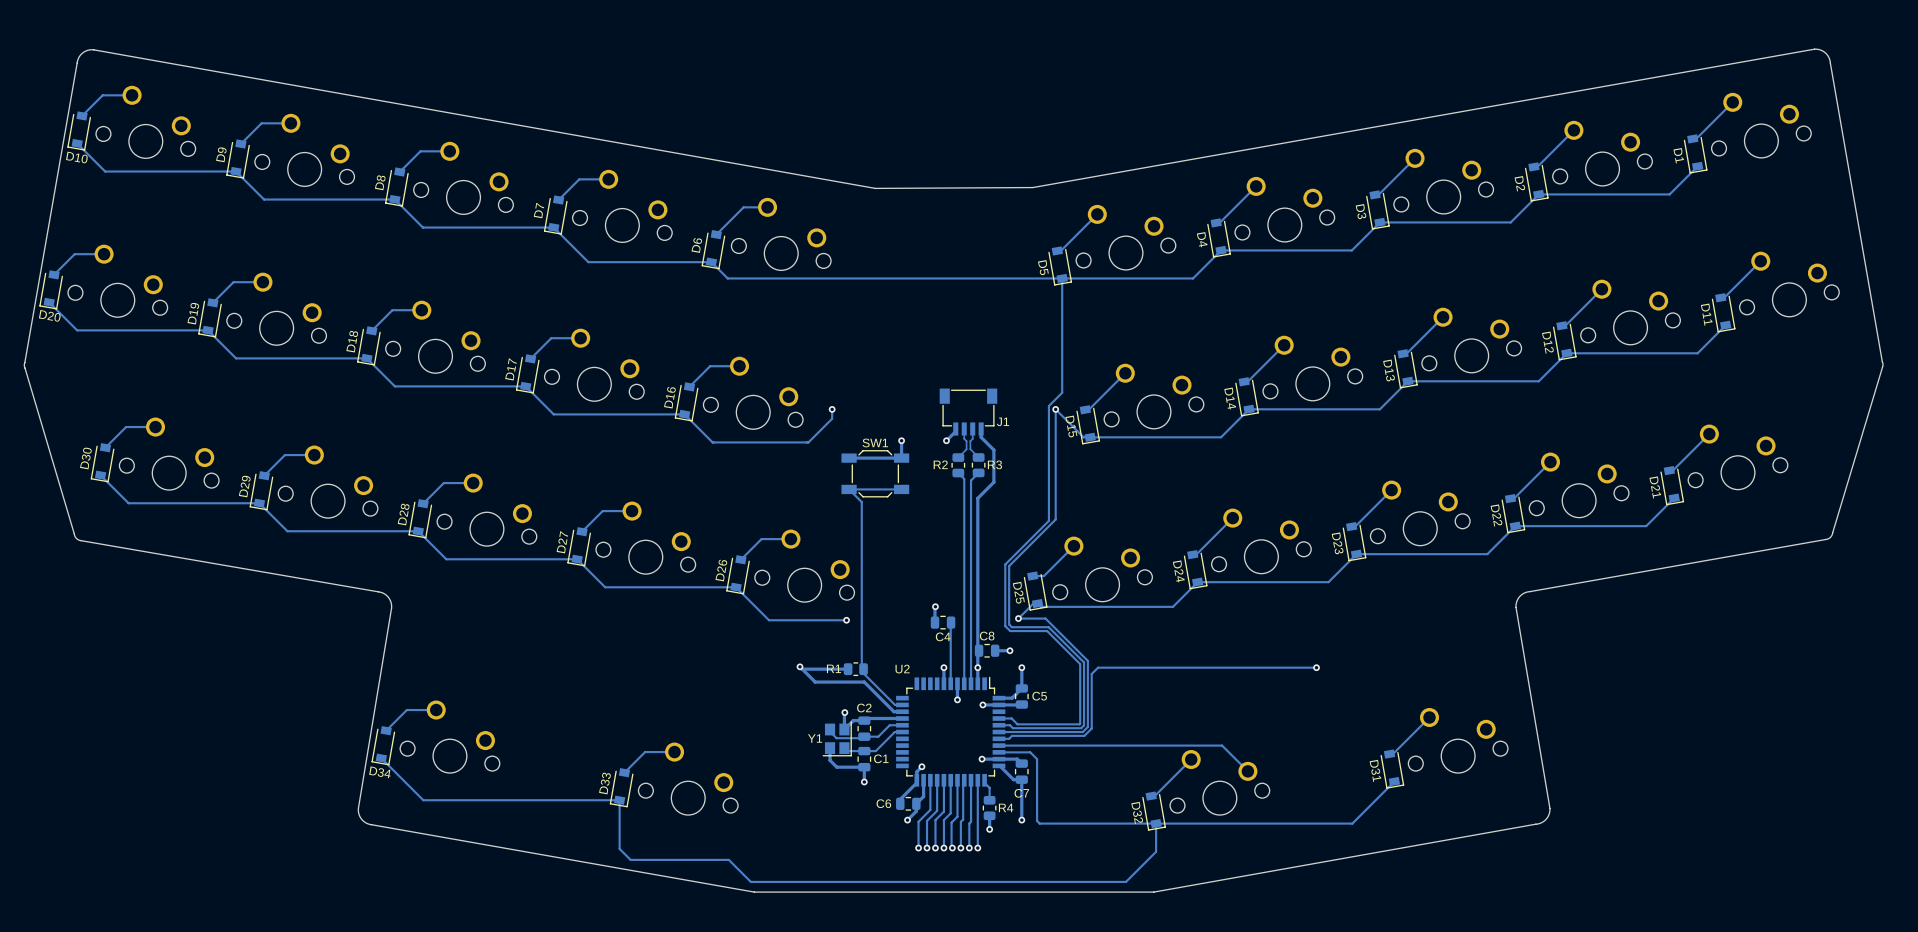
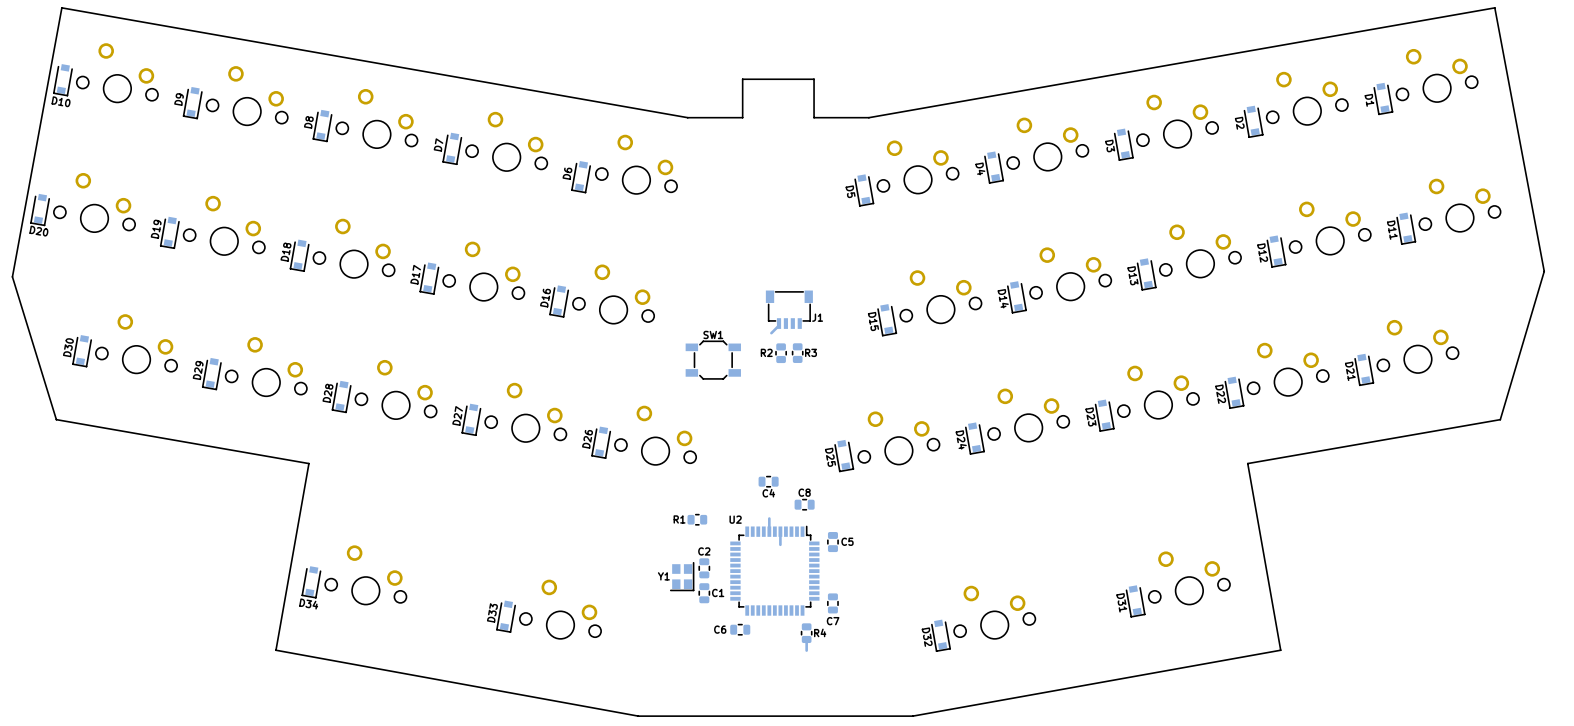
board edge: (1814, 49) (1032, 187) (875, 188) (88, 50) (81, 54) (77, 61) (24, 366) (74, 535) (77, 539) (380, 592) (388, 597) (391, 608) (358, 808) (359, 816) (366, 823) (754, 892) (1153, 892) (1542, 822) (1548, 816) (1549, 808) (1516, 607) (1520, 595) (1528, 591) (1826, 539) (1831, 536) (1883, 364) (1830, 61) (1825, 52) (1814, 49) -> (1494, 7) (1544, 271) (1500, 419) (1247, 463) (1280, 650) (912, 716) (638, 716) (275, 650) (308, 463) (56, 419) (12, 276) (61, 7) (687, 117) (742, 117) (742, 79) (814, 79) (814, 117) (868, 117) (1494, 7)
track: (132, 95) (102, 95) (82, 115) -> none
track: (1732, 102) (1696, 138) (1692, 138) -> none
track: (290, 123) (261, 123) (240, 144) -> none
track: (1573, 130) (1537, 166) (1533, 166) -> none
track: (77, 143) (105, 171) (236, 171) (264, 199) (394, 199) (422, 227) (553, 227) (588, 262) (711, 262) (727, 278) (1193, 278) (1221, 250) (1351, 250) (1379, 222) (1510, 222) (1538, 194) (1669, 194) (1697, 166) -> none
track: (449, 151) (420, 151) (399, 172) -> none
track: (1415, 158) (1378, 194) (1375, 194) -> none
track: (608, 179) (579, 179) (558, 200) -> none
track: (1256, 186) (1219, 222) (1216, 222) -> none
track: (767, 207) (743, 207) (716, 234) -> none
track: (1097, 214) (1060, 250) (1057, 250) -> none
track: (104, 254) (74, 254) (54, 274) -> none
track: (1760, 261) (1724, 297) (1720, 297) -> none
track: (1062, 278) (1062, 392) (1048, 406) (1048, 520) (1005, 564) (1005, 626) (1010, 631) (1047, 631) (1080, 664) (1080, 723) (1017, 724) (1011, 718) (998, 718) -> none
track: (262, 282) (233, 282) (212, 302) -> none
track: (1601, 289) (1565, 325) (1561, 325) -> none
track: (49, 302) (77, 330) (208, 330) (236, 358) (366, 358) (394, 386) (525, 386) (553, 414) (684, 414) (712, 442) (808, 442) (832, 418) (832, 409) -> none
track: (421, 310) (392, 310) (371, 330) -> none
track: (1443, 317) (1406, 353) (1403, 353) -> none
track: (1725, 325) (1697, 353) (1566, 353) (1538, 381) (1407, 381) (1379, 409) (1249, 409) (1221, 437) (1083, 437) (1055, 409) (1055, 519) (1009, 566) (1009, 624) (1011, 627) (1048, 627) (1084, 662) (1084, 725) (1081, 728) (1012, 728) (1009, 725) (998, 725) -> none
track: (580, 338) (551, 338) (530, 358) -> none
track: (1284, 345) (1247, 381) (1244, 381) -> none
track: (739, 366) (710, 366) (689, 386) -> none
track: (1125, 373) (1088, 409) (1085, 409) -> none
via: (832, 409) -> none
via: (1055, 409) -> none
track: (155, 427) (126, 427) (105, 447) -> none
track: (964, 429) (966, 449) (958, 457) -> none
track: (972, 429) (970, 449) (978, 457) -> none
track: (981, 429) (981, 437) (993, 450) (993, 482) (977, 498) (977, 683) -> none
track: (1709, 434) (1672, 470) (1669, 470) -> none
track: (901, 440) (901, 458) (849, 458) -> none
via: (901, 440) -> none
via: (946, 440) -> none
track: (314, 455) (284, 455) (264, 475) -> none
track: (1550, 462) (1513, 498) (1510, 498) -> none
track: (978, 472) (971, 480) (971, 683) -> none
track: (958, 473) (964, 478) (964, 683) -> none
track: (100, 475) (128, 503) (259, 503) (287, 531) (418, 531) (446, 559) (577, 559) (605, 587) (736, 587) (769, 620) (846, 620) -> none
track: (473, 483) (443, 483) (423, 503) -> none
track: (901, 489) (849, 489) (861, 502) (861, 667) (863, 673) (895, 704) (902, 704) -> none
track: (1391, 490) (1355, 526) (1351, 526) -> none
track: (1674, 498) (1646, 526) (1515, 526) (1487, 554) (1356, 554) (1328, 582) (1197, 582) (1172, 606) (1040, 606) (1037, 603) (1033, 603) (1018, 618) (1045, 618) (1087, 660) (1087, 726) (1082, 732) (998, 732) -> none
track: (632, 511) (602, 511) (582, 531) -> none
track: (1232, 518) (1196, 554) (1192, 554) -> none
track: (790, 539) (761, 539) (740, 559) -> none
track: (1073, 546) (1043, 576) (1032, 576) -> none
track: (935, 606) (934, 622) -> none
via: (935, 606) -> none
via: (1018, 618) -> none
via: (846, 620) -> none
track: (951, 622) (950, 683) -> none
track: (1009, 650) (995, 650) -> none
via: (1009, 650) -> none
track: (799, 666) (815, 682) (864, 682) (893, 711) (902, 711) -> none
via: (799, 666) -> none
via: (943, 667) -> none
via: (977, 667) -> none
track: (1021, 667) (1021, 688) (1012, 698) (998, 698) -> none
via: (1021, 667) -> none
track: (1316, 667) (1098, 667) (1091, 674) (1091, 728) (1084, 735) (1012, 735) (1009, 738) (998, 738) -> none
via: (1316, 667) -> none
track: (848, 669) (802, 669) -> none
via: (957, 699) -> none
via: (982, 704) -> none
track: (1021, 704) (982, 704) -> none
track: (436, 710) (406, 710) (386, 730) -> none
track: (844, 712) (844, 729) (853, 720) (864, 720) (866, 718) (902, 718) -> none
via: (844, 712) -> none
track: (1429, 717) (1392, 754) (1389, 754) -> none
track: (902, 725) (889, 725) (878, 736) (862, 738) (836, 738) (830, 729) -> none
track: (902, 732) (894, 732) (875, 751) (847, 751) (844, 748) -> none
track: (998, 745) (1222, 745) (1247, 771) -> none
track: (830, 748) (830, 760) (836, 767) (864, 767) (864, 782) -> none
track: (674, 752) (645, 752) (624, 772) -> none
track: (998, 752) (1030, 752) (1037, 759) (1037, 820) (1039, 823) (1352, 823) (1394, 781) -> none
track: (381, 758) (423, 800) (619, 800) (619, 848) (630, 859) (728, 859) (750, 881) (1125, 881) (1156, 851) (1156, 823) -> none
track: (982, 759) (1017, 759) (1021, 763) -> none
via: (982, 759) -> none
track: (1191, 759) (1154, 796) (1151, 796) -> none
track: (998, 765) (1013, 779) (1021, 779) (1021, 820) -> none
track: (921, 766) (916, 771) (916, 782) (900, 799) (900, 803) -> none
via: (921, 766) -> none
track: (923, 780) (923, 796) (916, 803) (916, 811) (907, 820) -> none
track: (930, 780) (930, 809) (918, 821) (918, 848) -> none
track: (937, 780) (937, 810) (927, 820) (927, 848) -> none
track: (943, 780) (943, 811) (935, 820) (935, 848) -> none
track: (950, 780) (950, 813) (943, 820) (943, 848) -> none
track: (957, 780) (957, 816) (951, 822) (952, 848) -> none
track: (964, 780) (960, 848) -> none
track: (971, 780) (969, 848) -> none
track: (977, 780) (977, 848) -> none
track: (984, 780) (989, 787) (989, 800) -> none
via: (864, 782) -> none
via: (907, 820) -> none
via: (1021, 820) -> none
via: (989, 829) -> none
via: (918, 848) -> none
via: (927, 848) -> none
via: (935, 848) -> none
via: (943, 848) -> none
via: (952, 848) -> none
via: (960, 848) -> none
via: (969, 848) -> none
via: (977, 848) -> none

